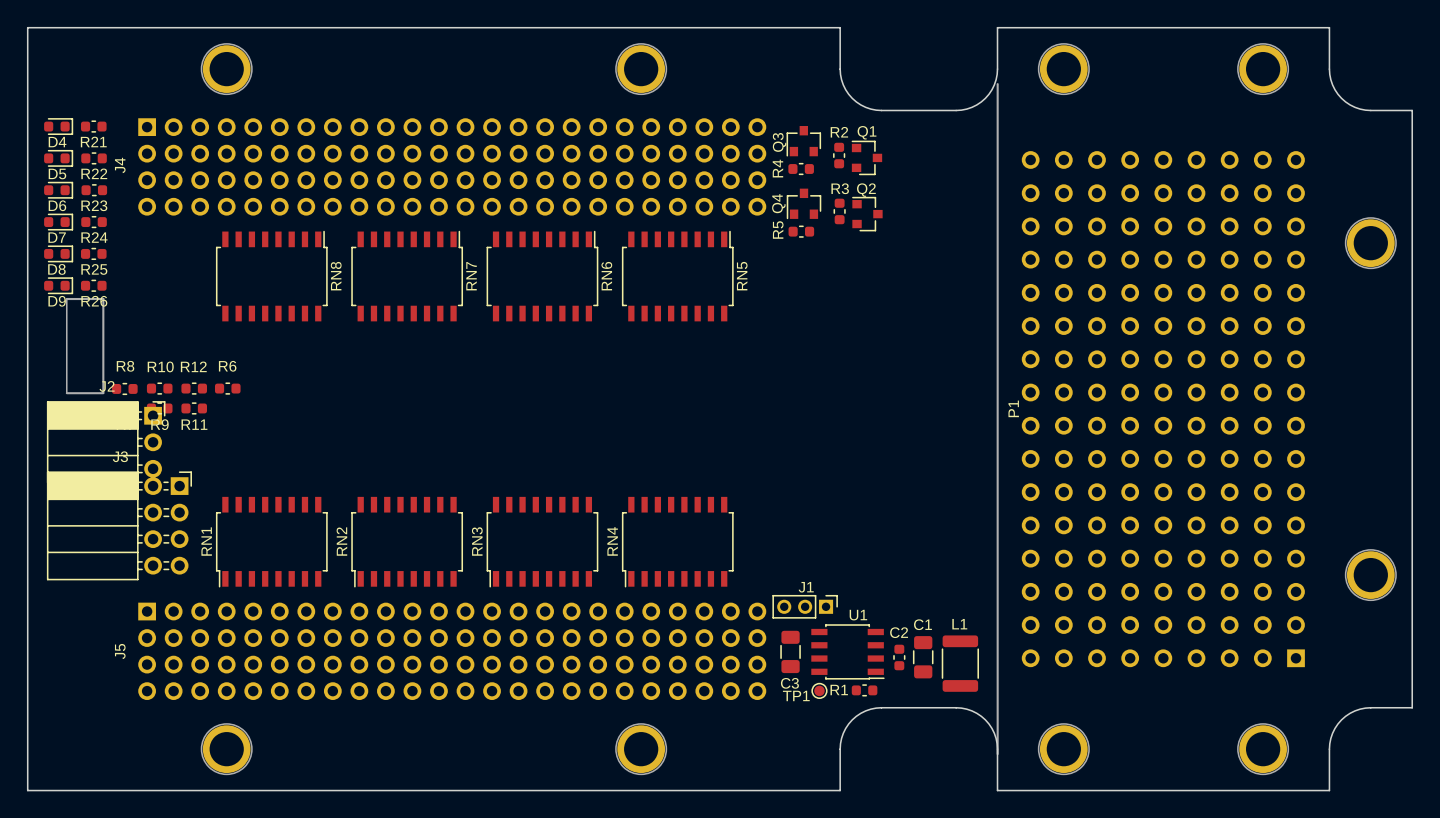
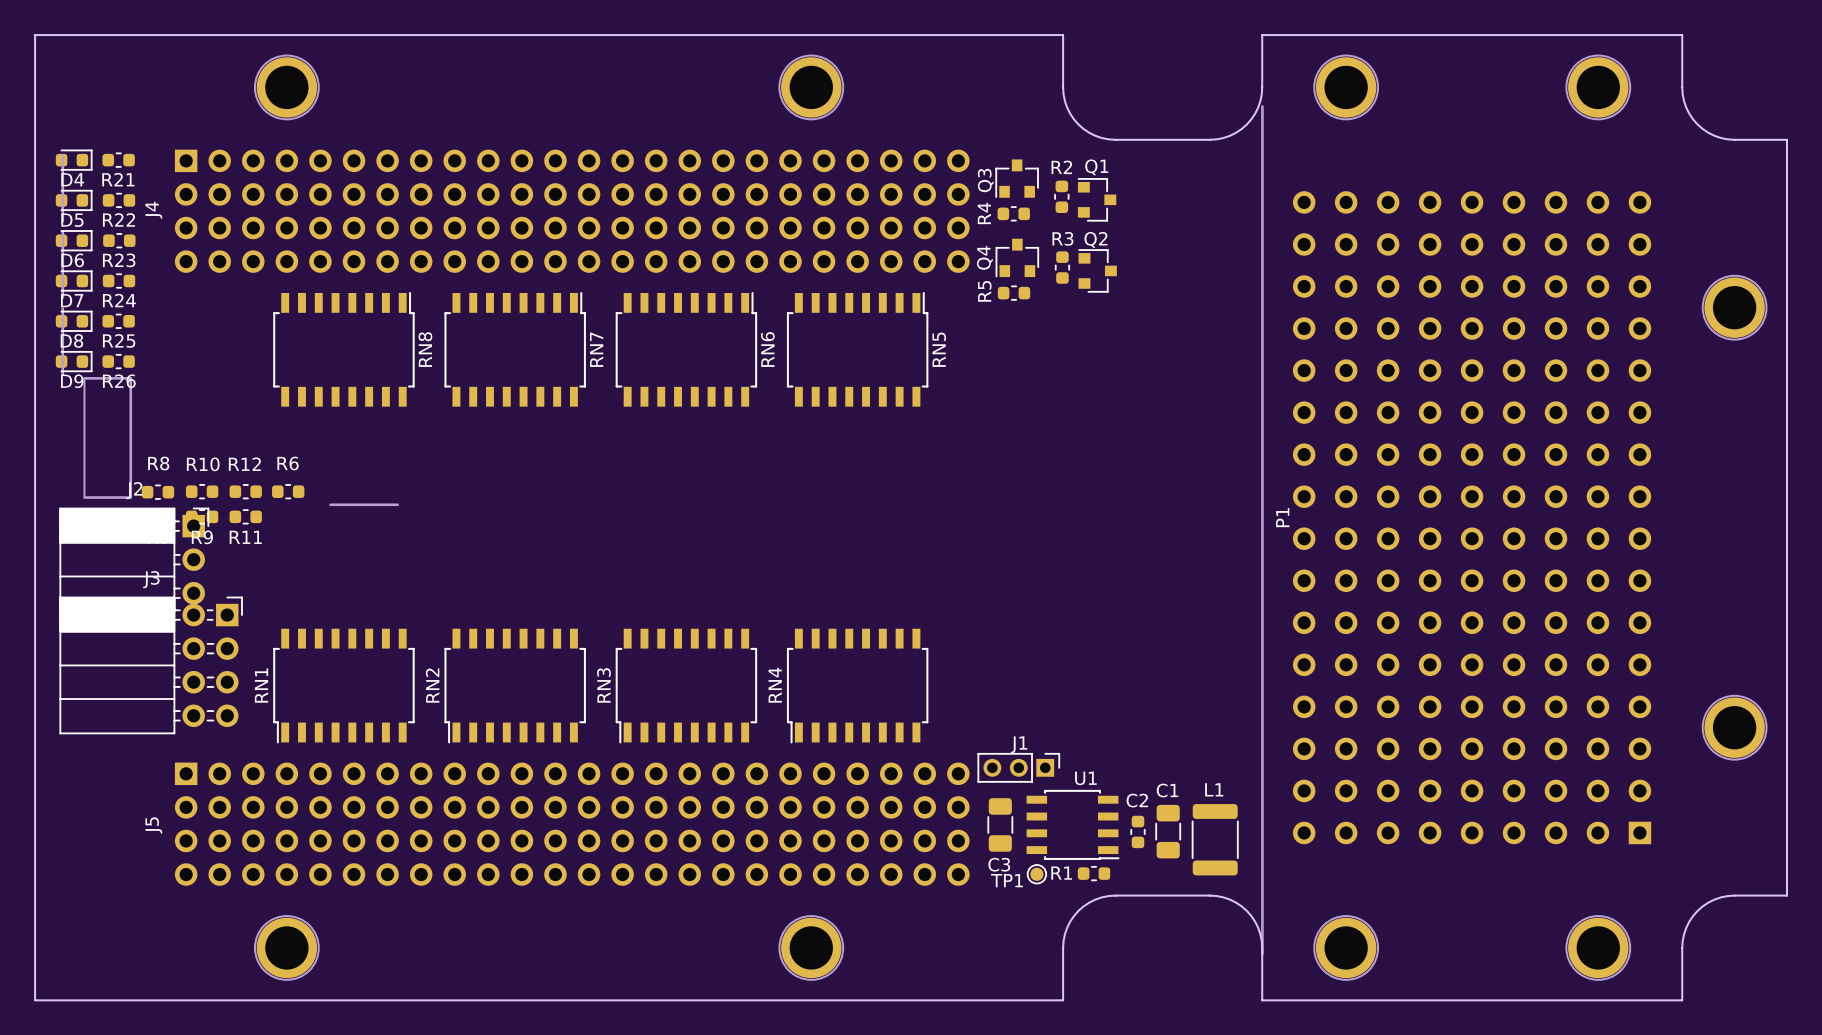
line: none -> (62, 155) (62, 221)
line: none -> (62, 231) (62, 297)
line: none -> (62, 308) (62, 374)
line: none -> (330, 504) (397, 504)

